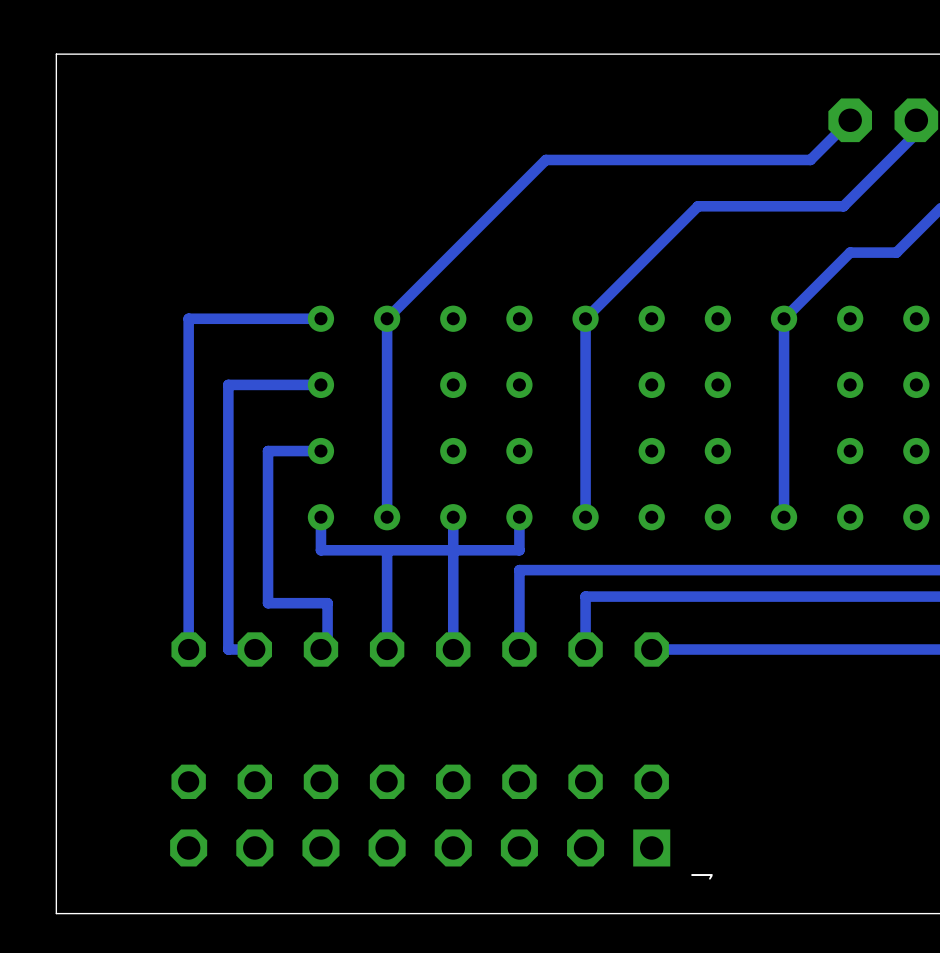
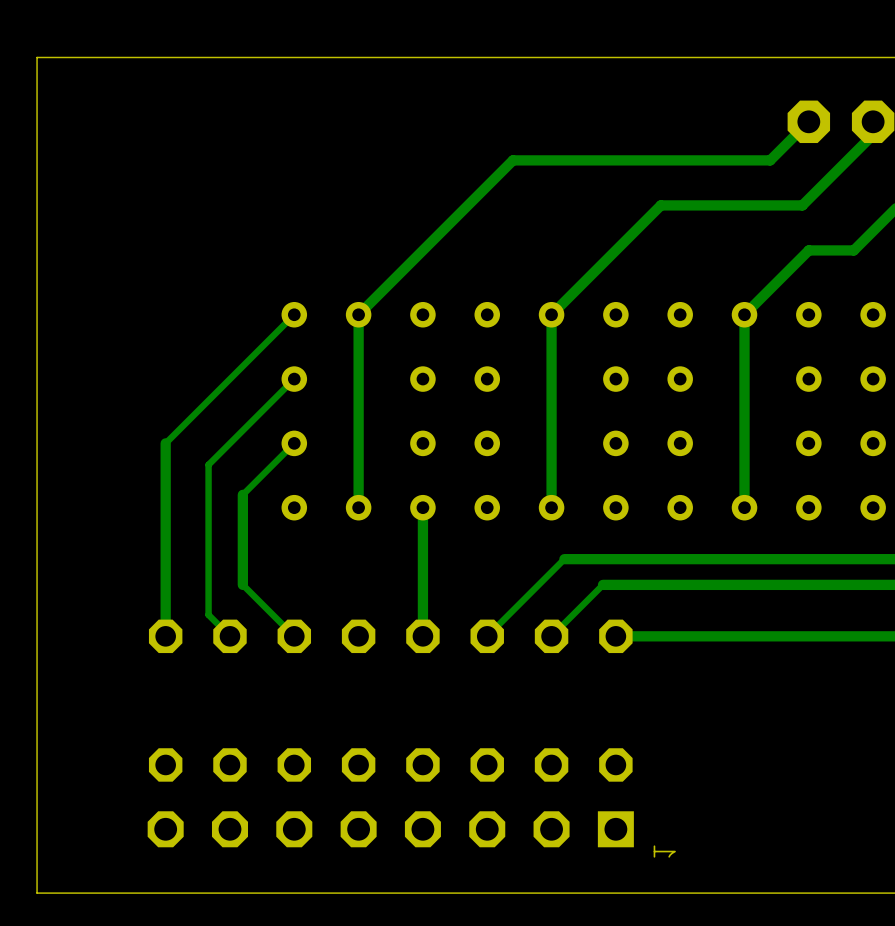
track: (320, 318) (188, 318) (188, 451) -> (294, 314) (165, 443)
track: (320, 384) (228, 384) (228, 649) (254, 649) -> (294, 379) (208, 464) (208, 614) (229, 636)
track: (320, 451) (268, 451) (268, 503) -> (294, 443) (242, 494)
track: (519, 517) (519, 550) (320, 550) (320, 517) -> none
track: (387, 550) (387, 649) -> none
track: (598, 570) (519, 570) (519, 649) -> (564, 559) (487, 636)
track: (268, 596) (268, 603) (327, 603) (327, 649) (320, 649) -> (242, 584) (294, 636)
track: (638, 596) (585, 596) (585, 649) -> (603, 584) (551, 636)

